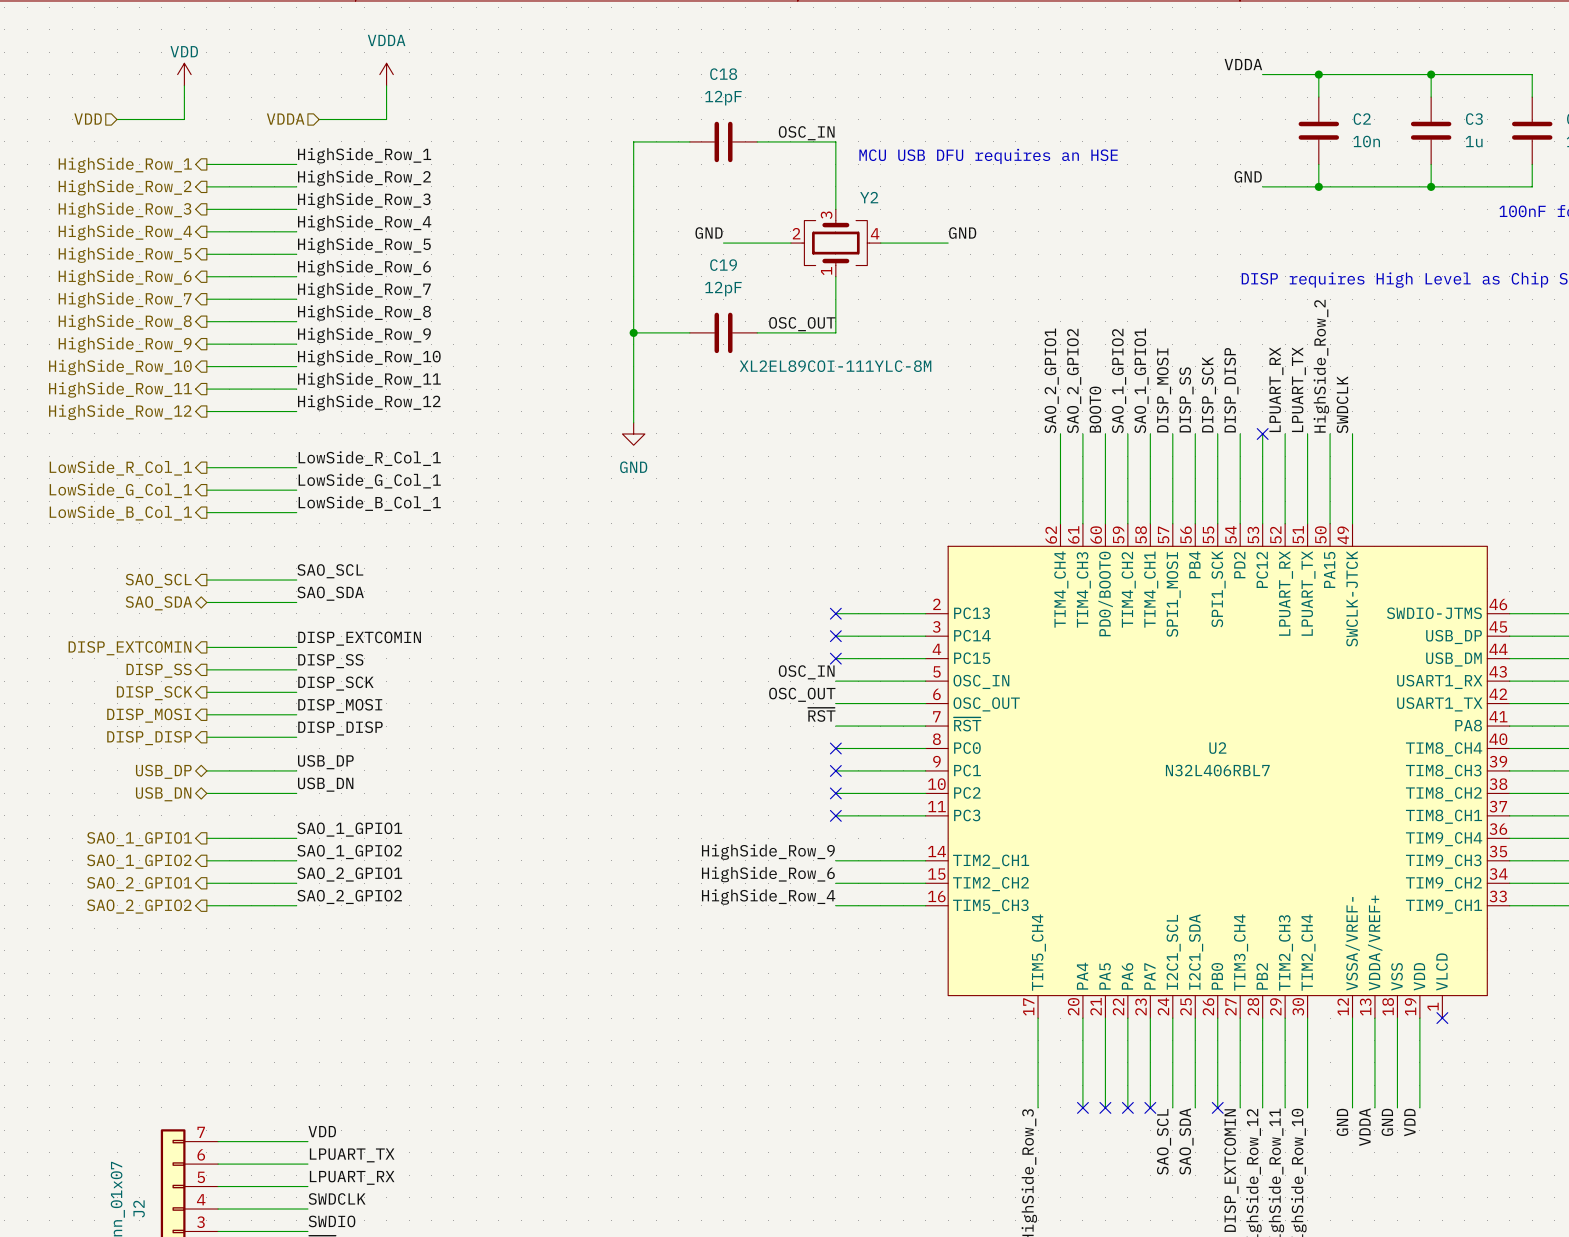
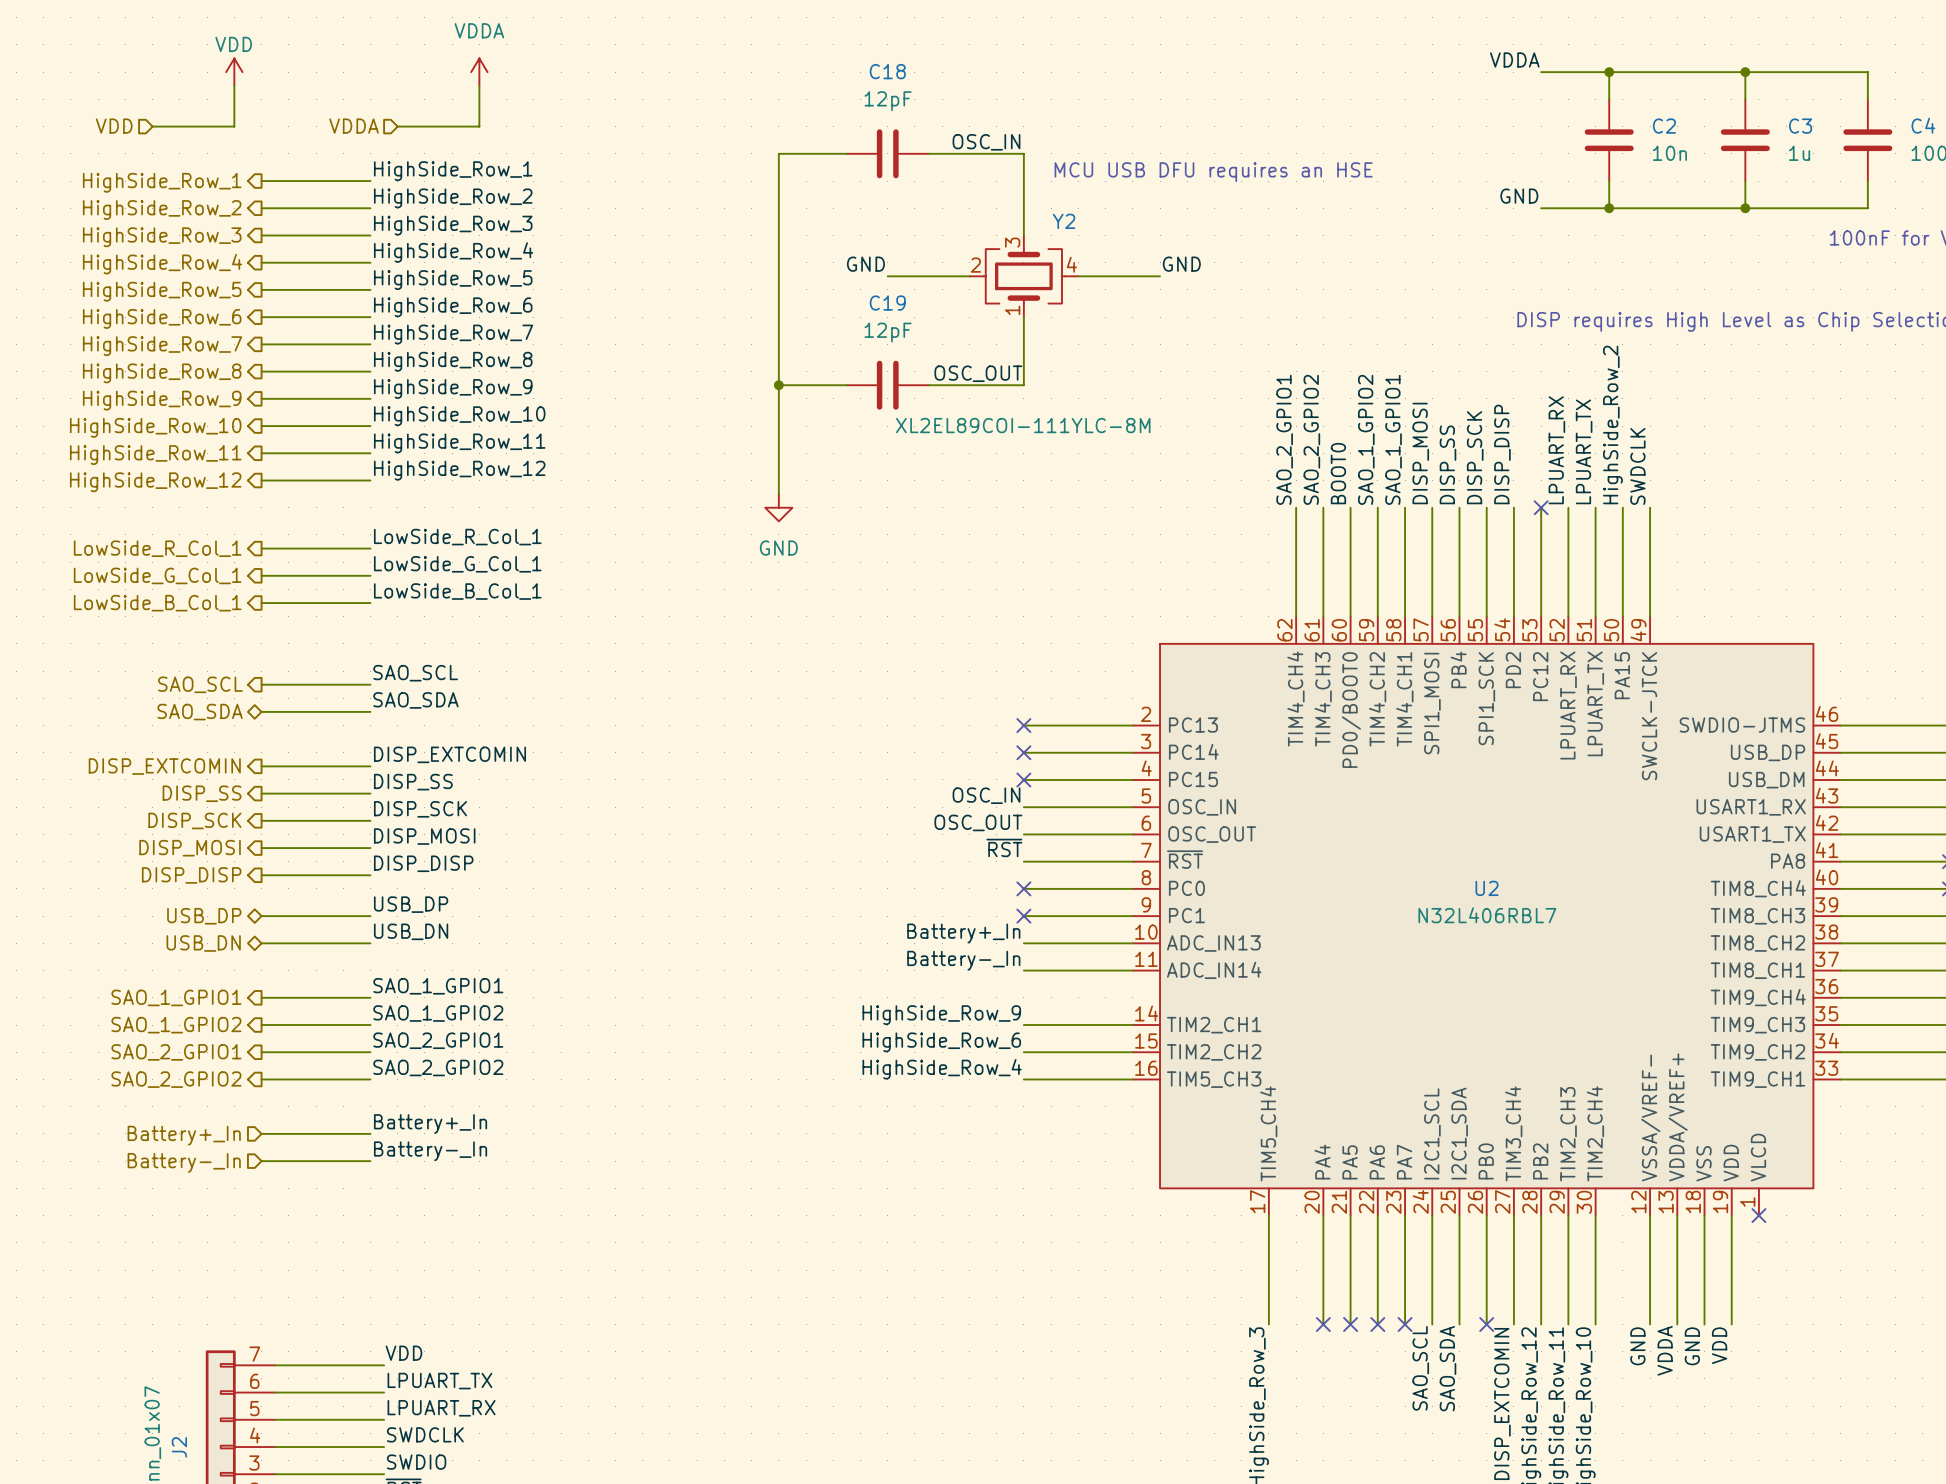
label: none -> Battery+_In (963, 933)
no-connect mark: (835, 793) -> none
U2 pin name: PC2 (967, 793) -> ADC_IN13 (1213, 943)
label: none -> Battery-_In (963, 960)
no-connect mark: (835, 815) -> none
U2 pin name: PC3 (967, 815) -> ADC_IN14 (1214, 970)
label: none -> Battery+_In (430, 1124)
wire: none -> (261, 1133) (370, 1133)
hierarchical label: none -> Battery+_In (184, 1135)
label: none -> Battery-_In (430, 1151)
wire: none -> (261, 1161) (370, 1161)
hierarchical label: none -> Battery-_In (184, 1162)

